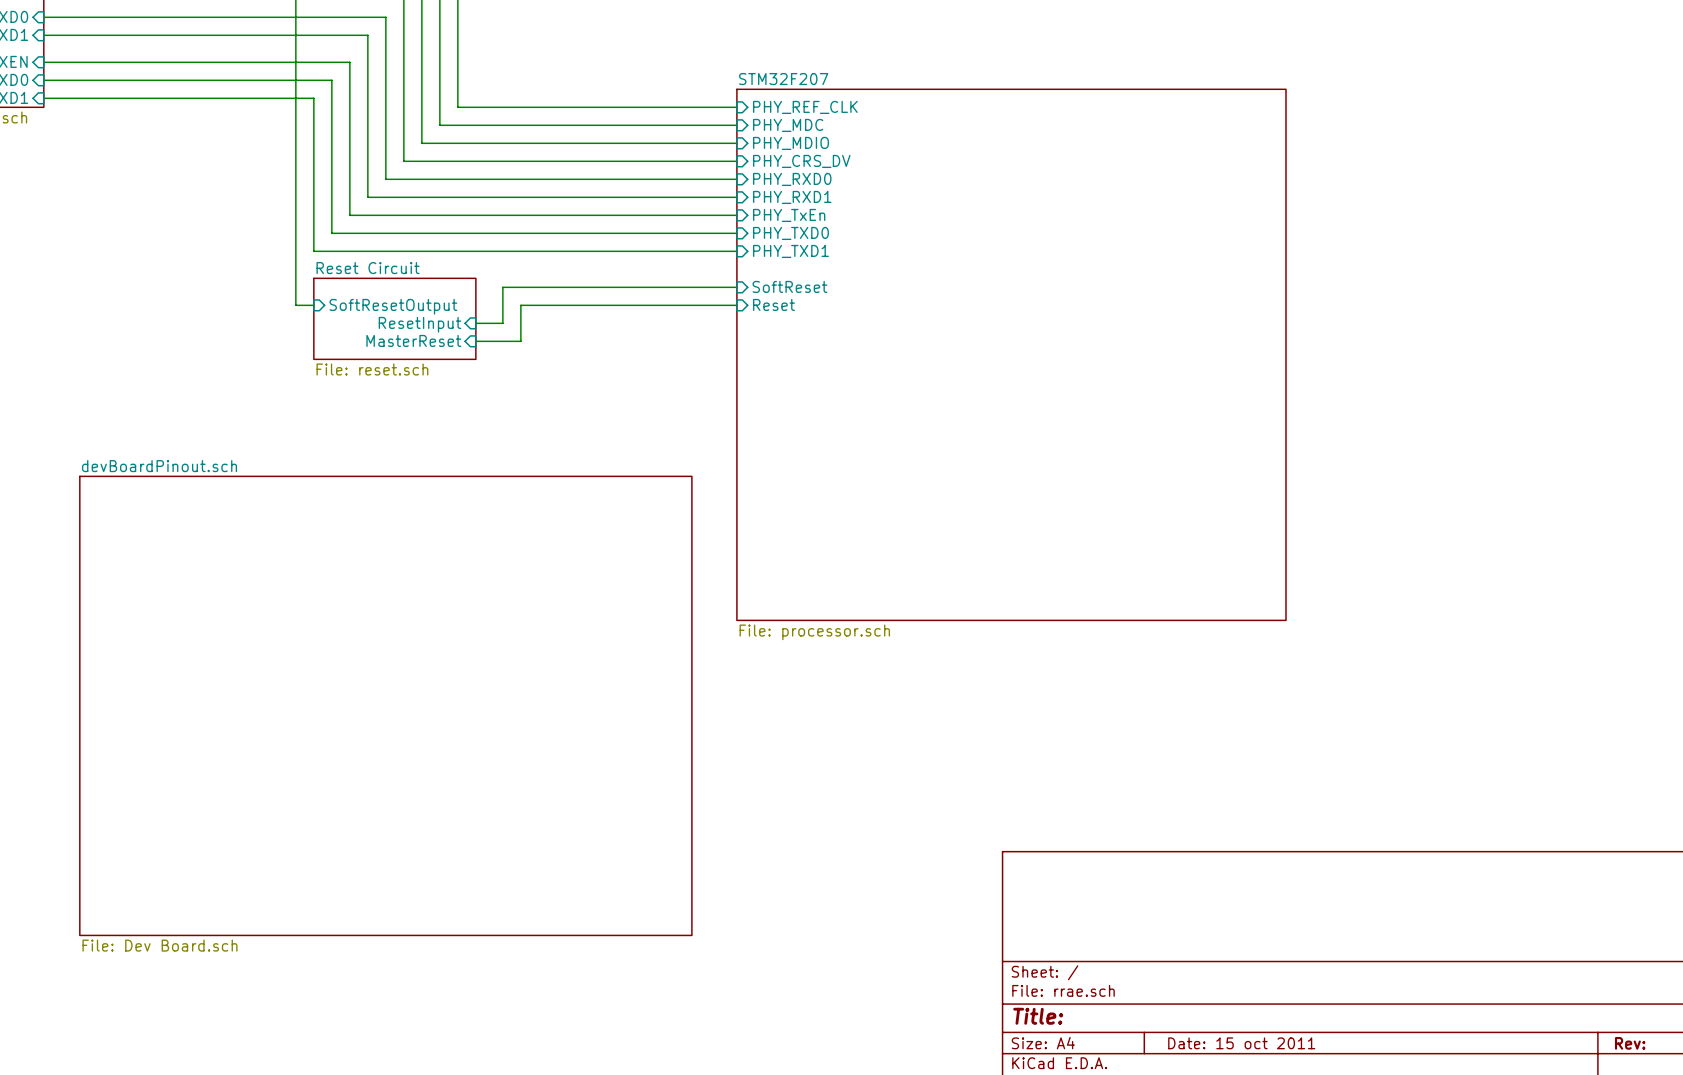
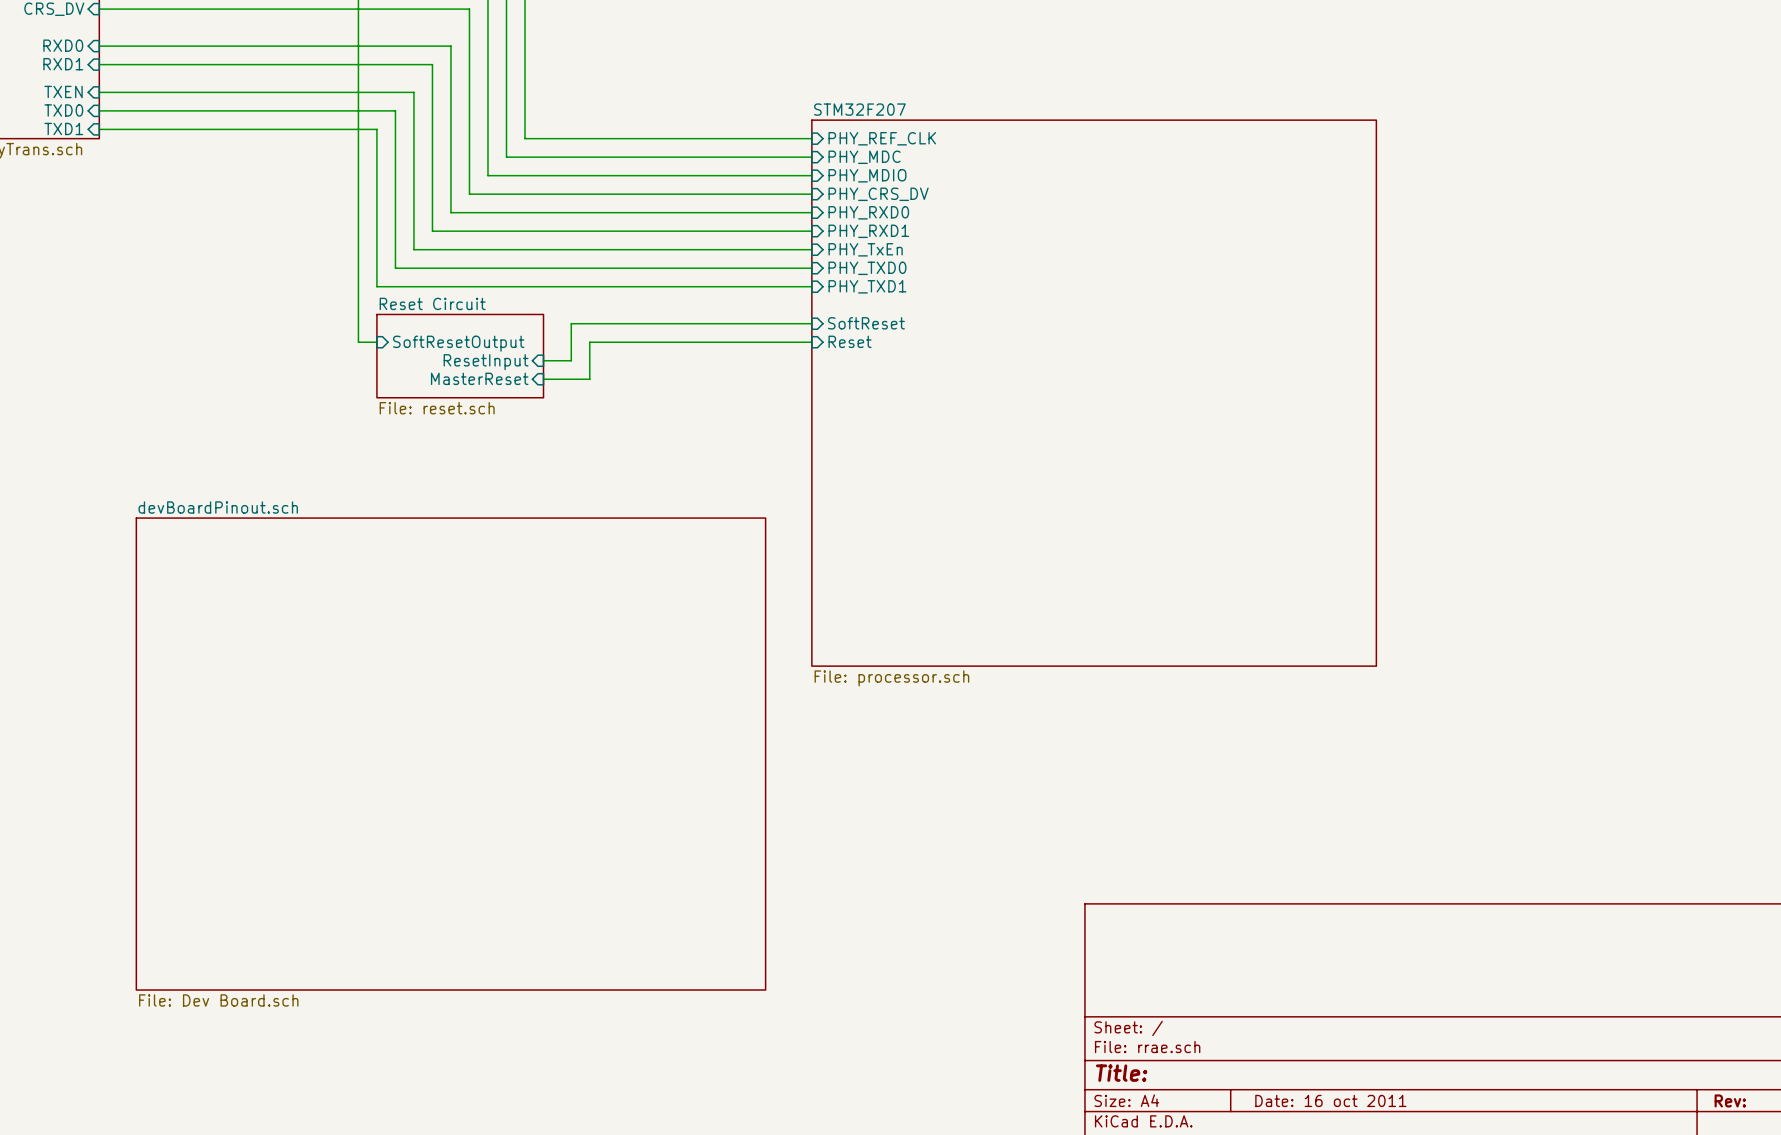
title block: Date: 15 oct 2011 (1241, 1043) -> Date: 16 oct 2011 (1330, 1100)

